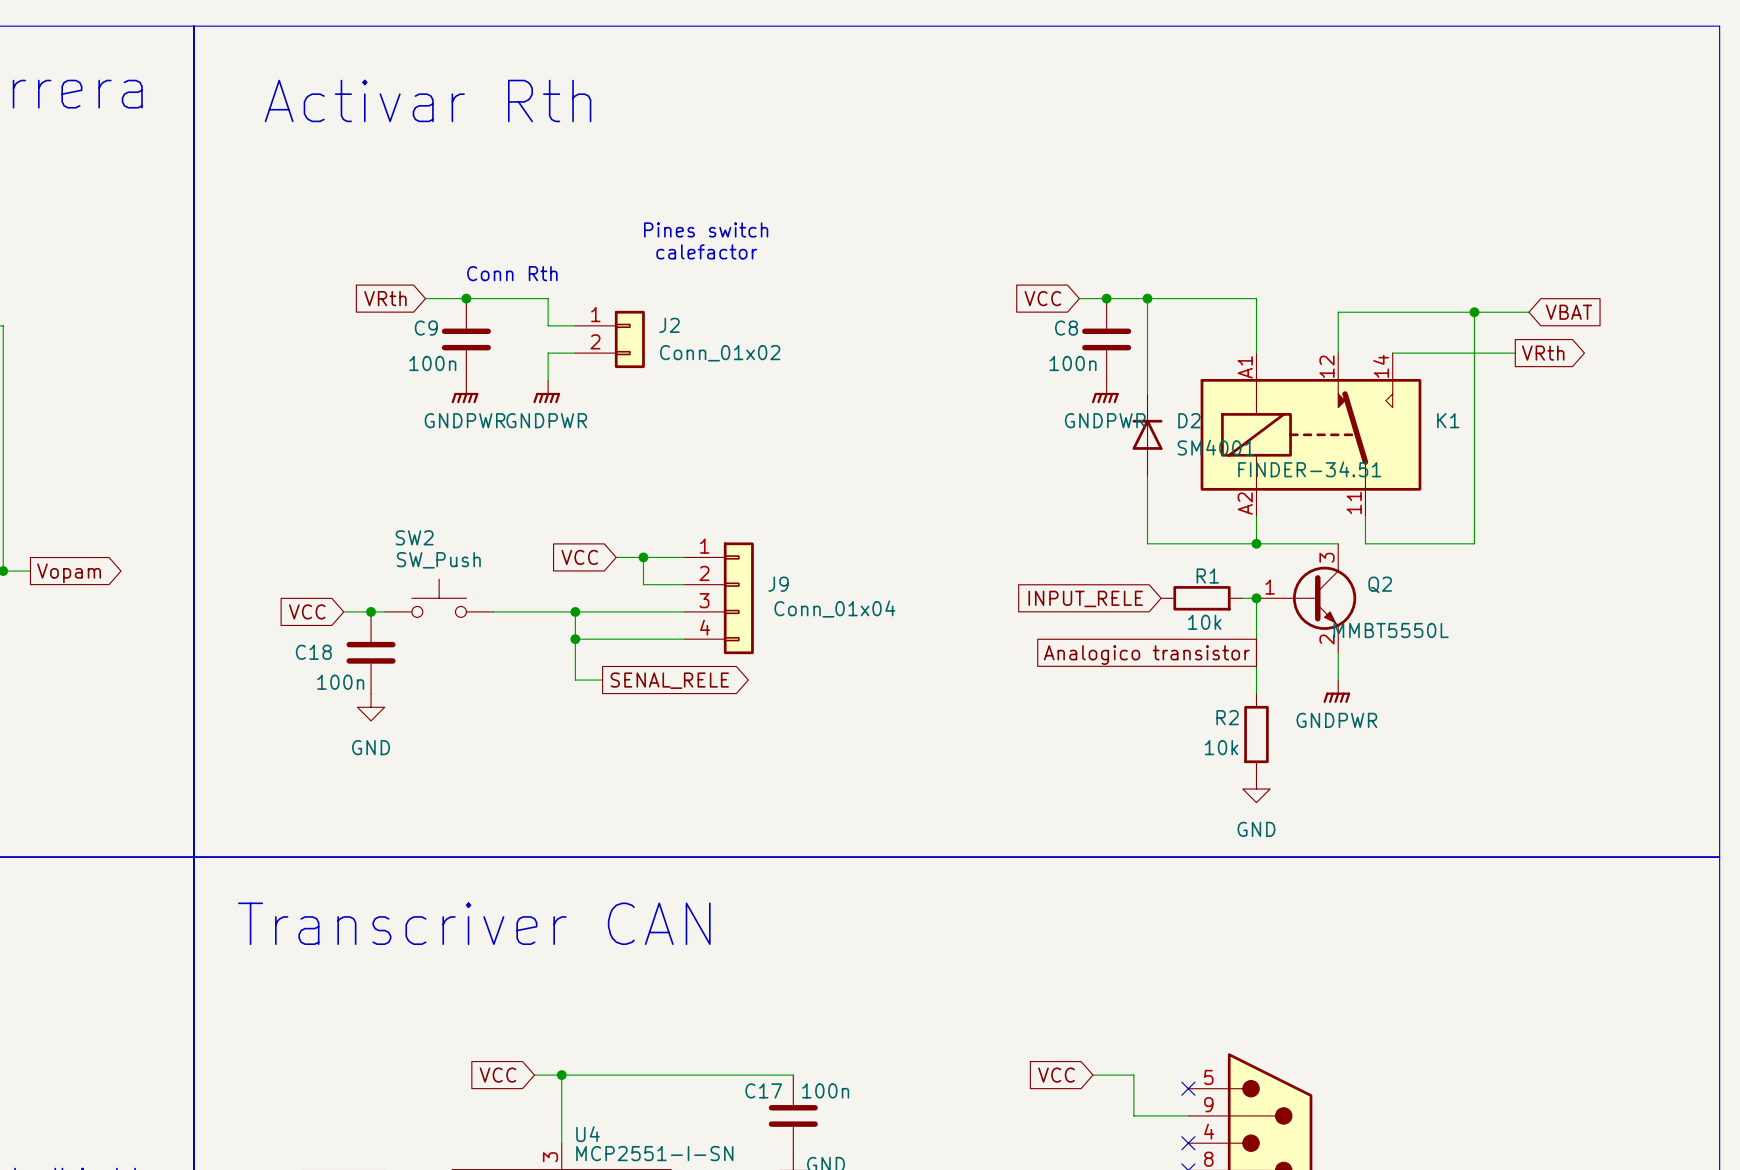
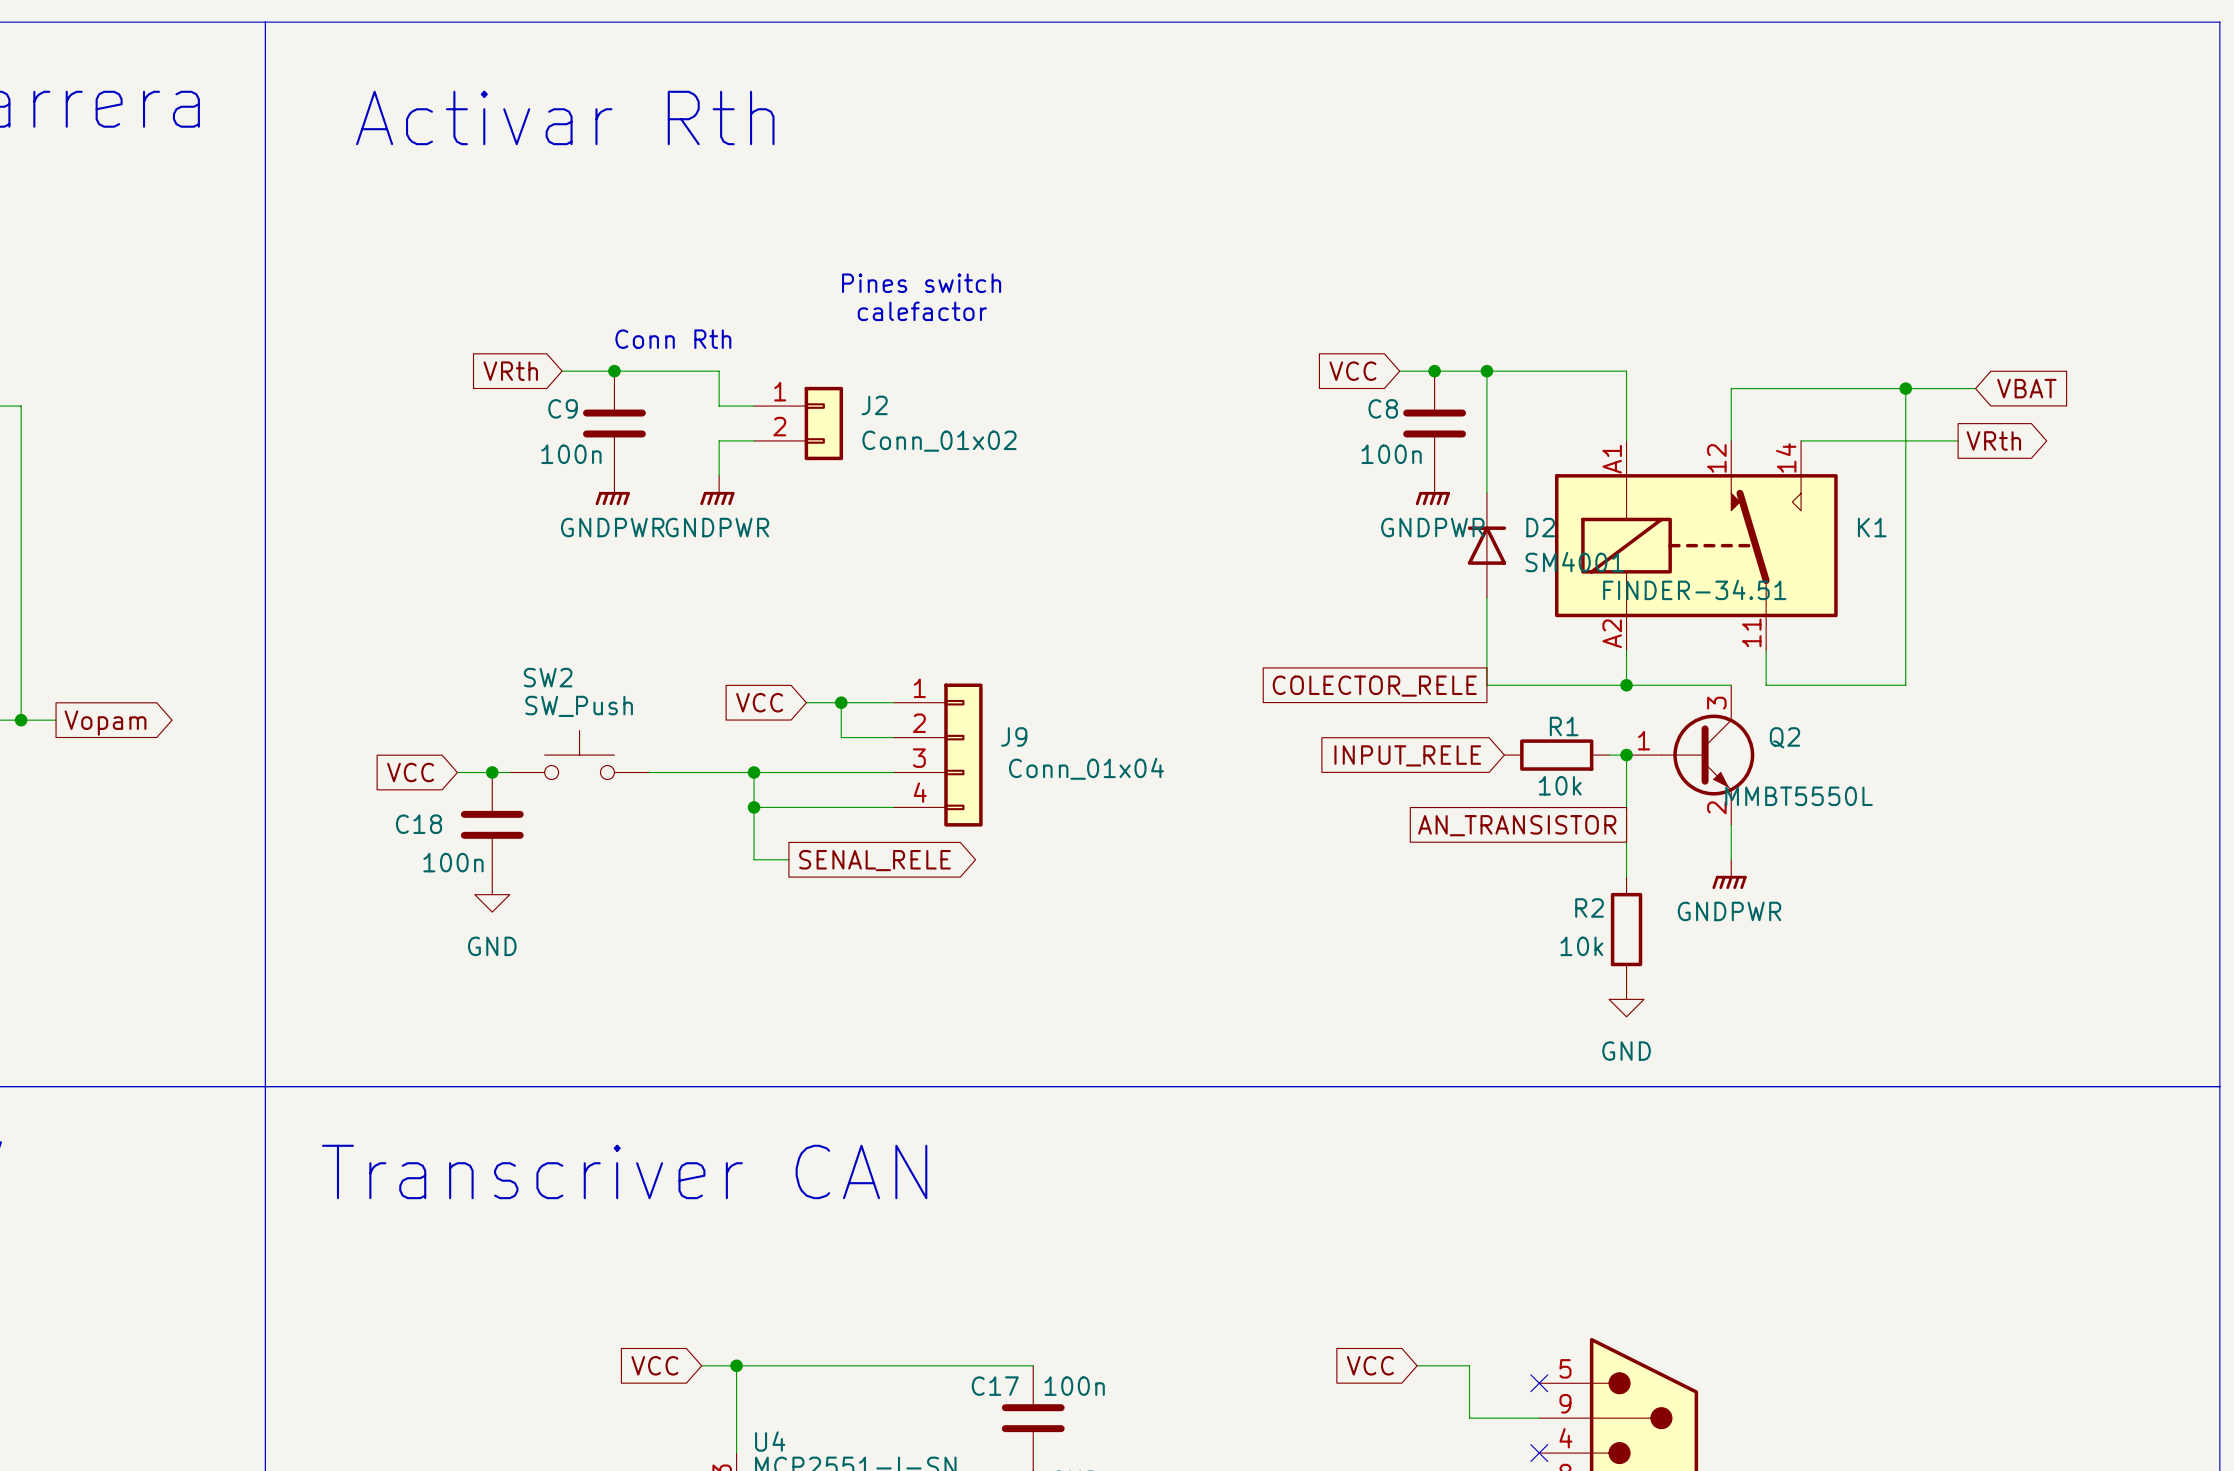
global label: none -> COLECTOR_RELE (1374, 686)
global label: Analogico transistor (1146, 655) -> AN_TRANSISTOR (1517, 825)

